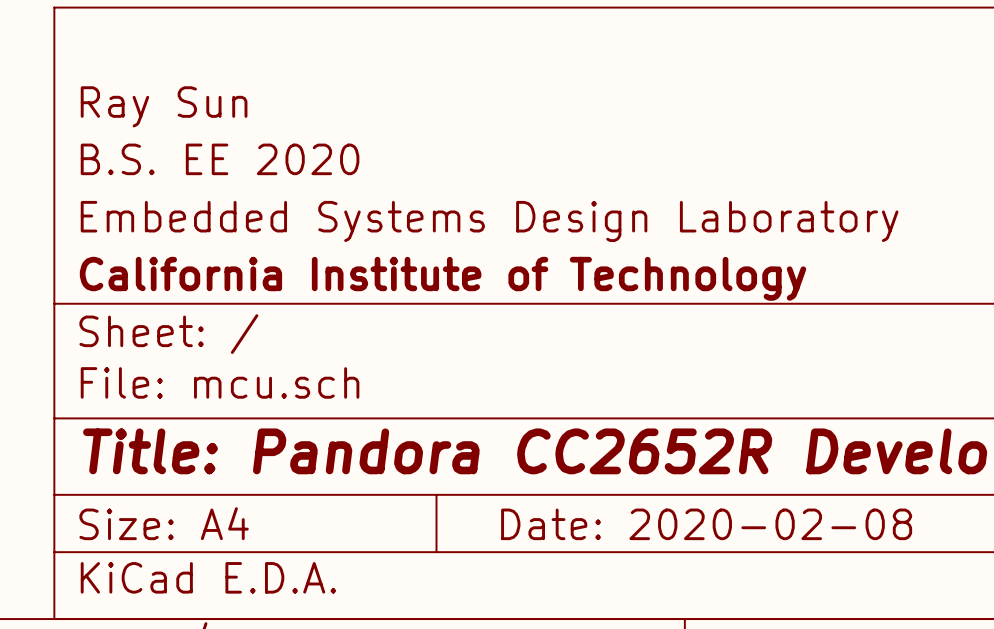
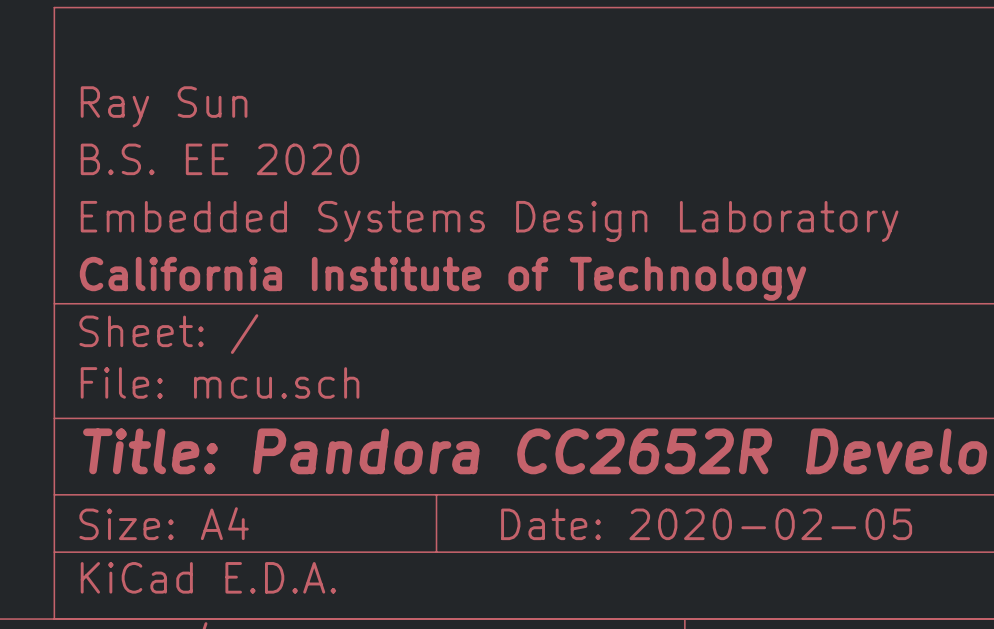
title block: Date: 2020-02-08 (706, 524) -> Date: 2020-02-05 (706, 524)

